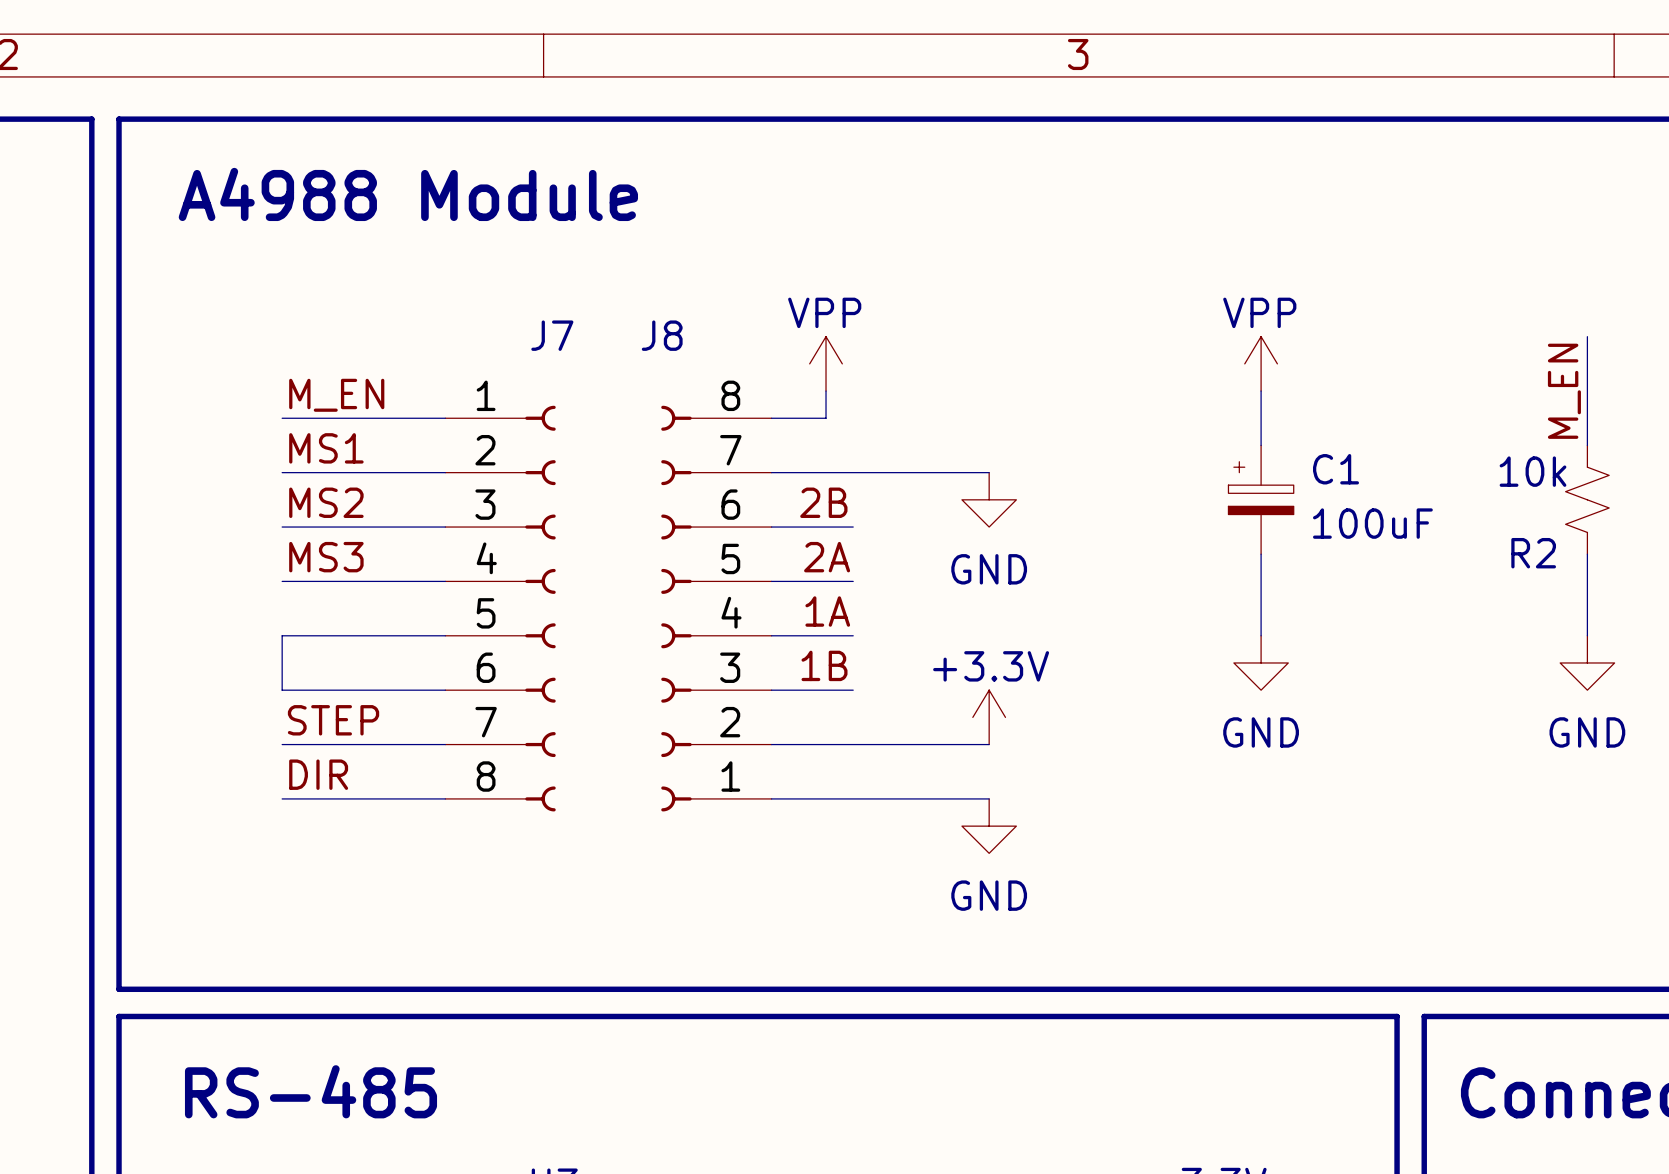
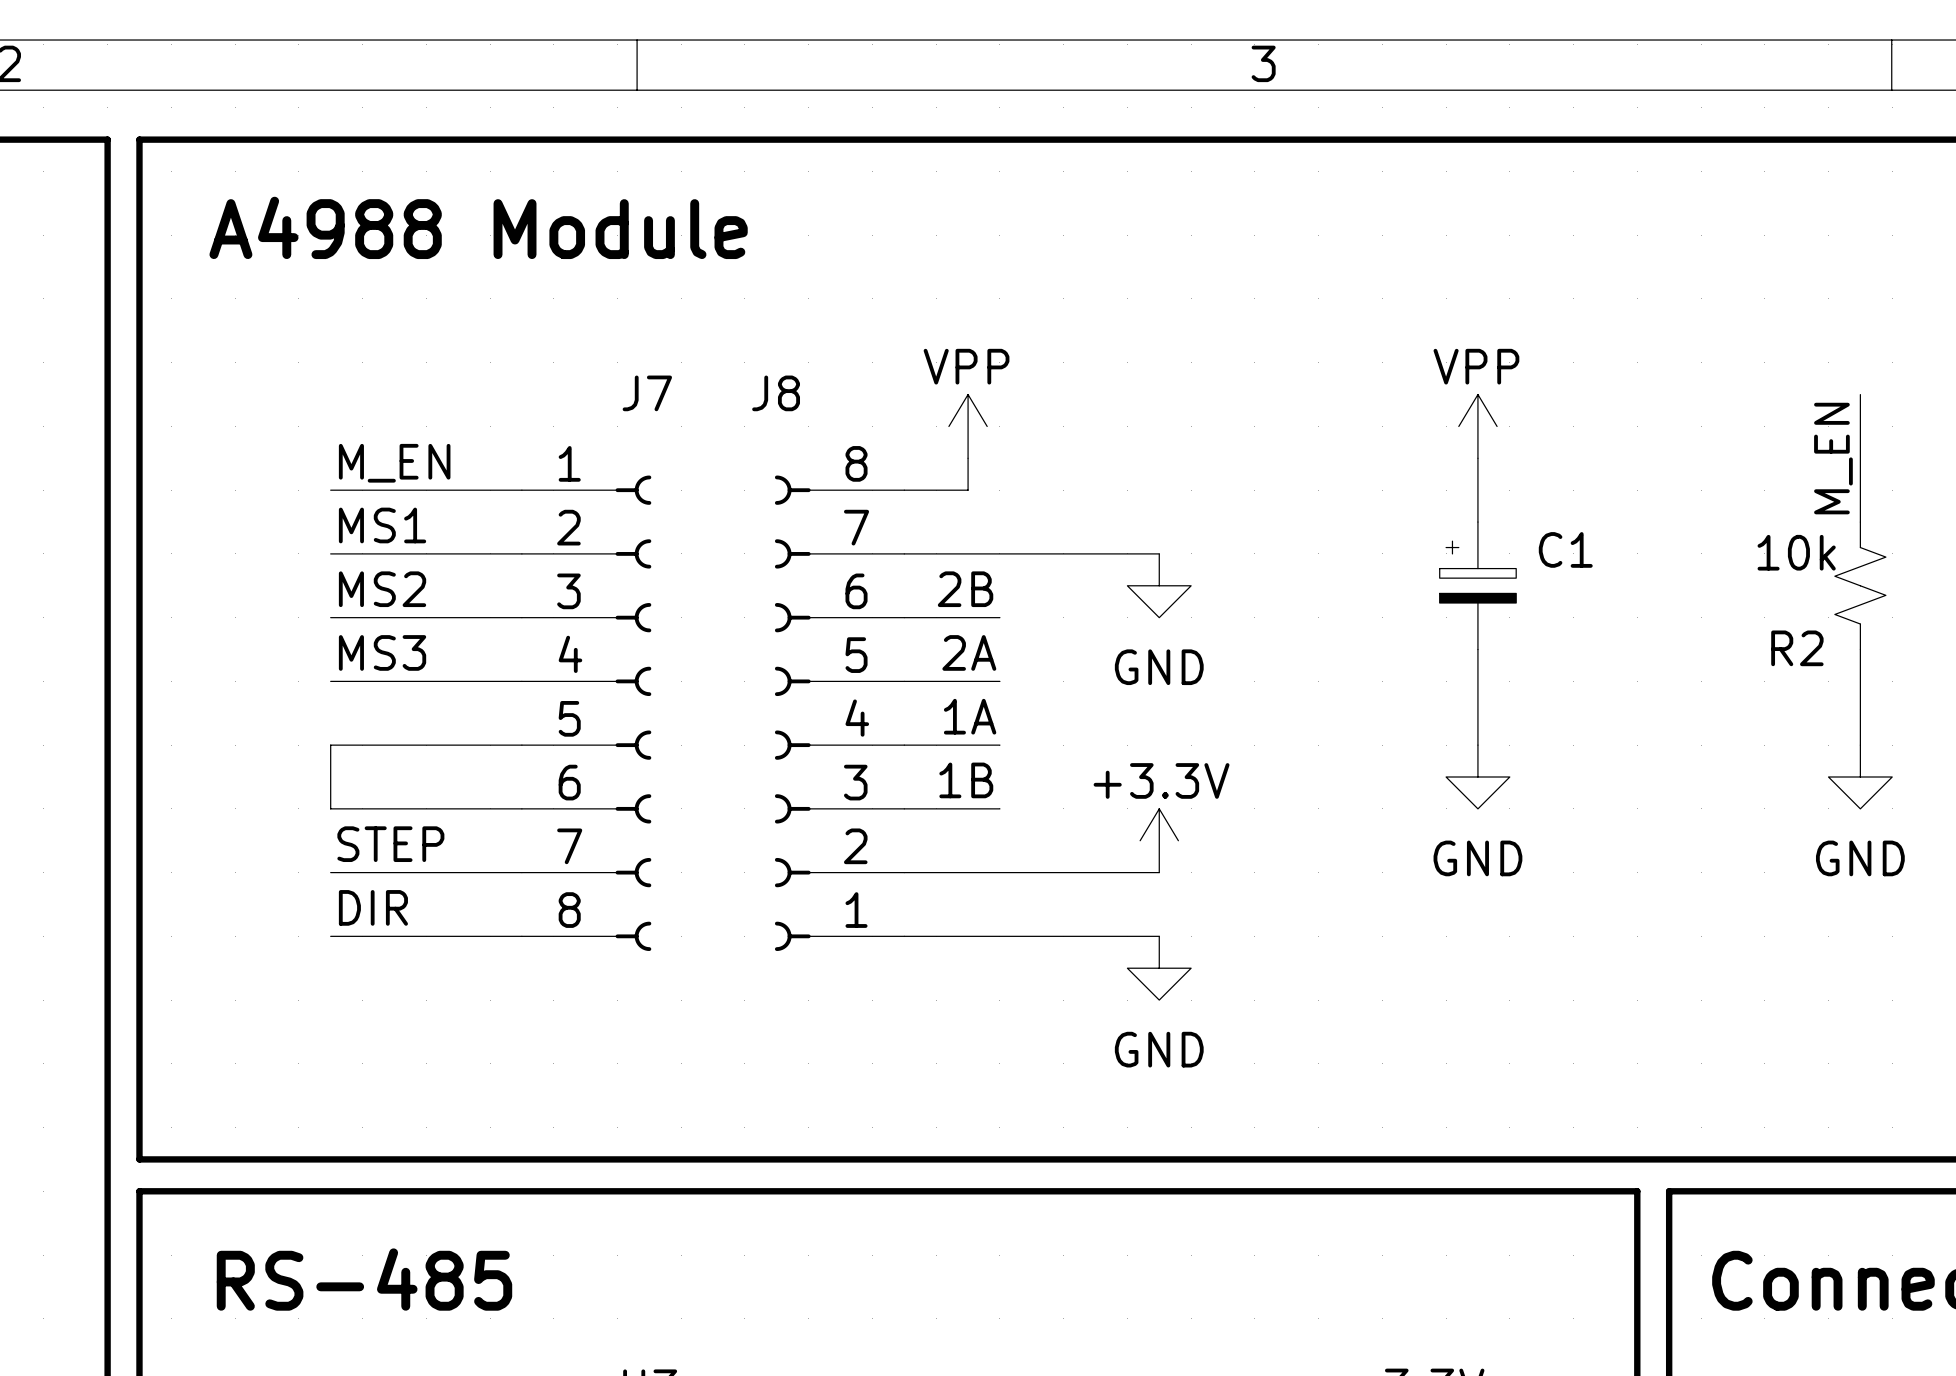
C1 value: 100uF (1372, 523) -> none

